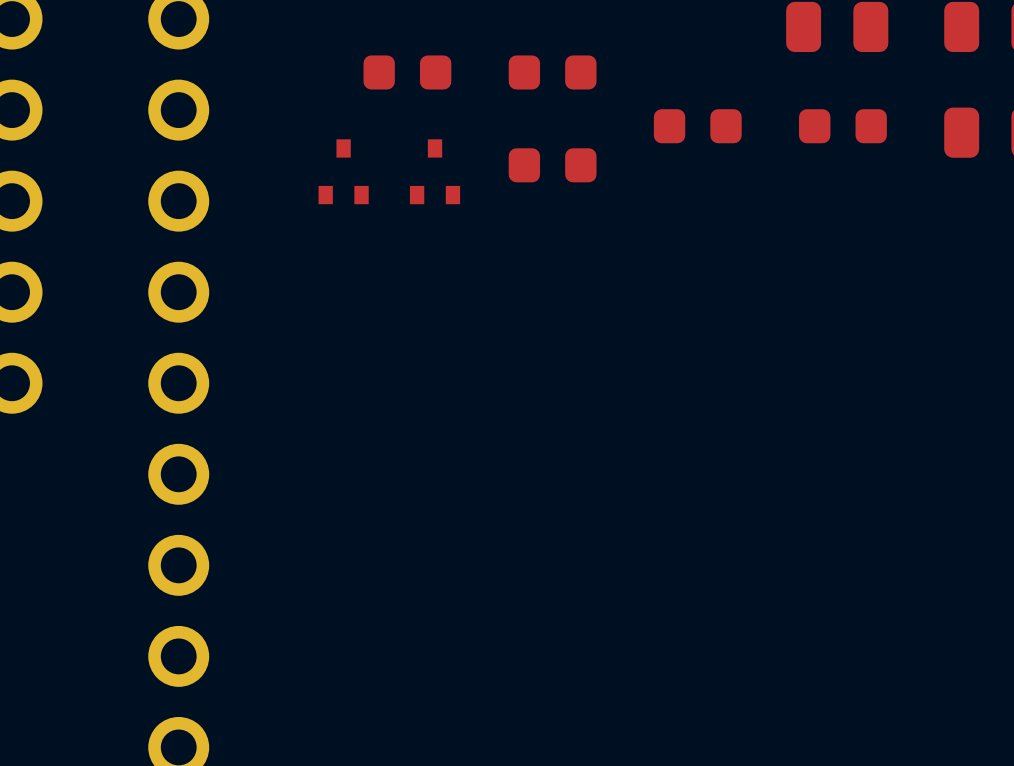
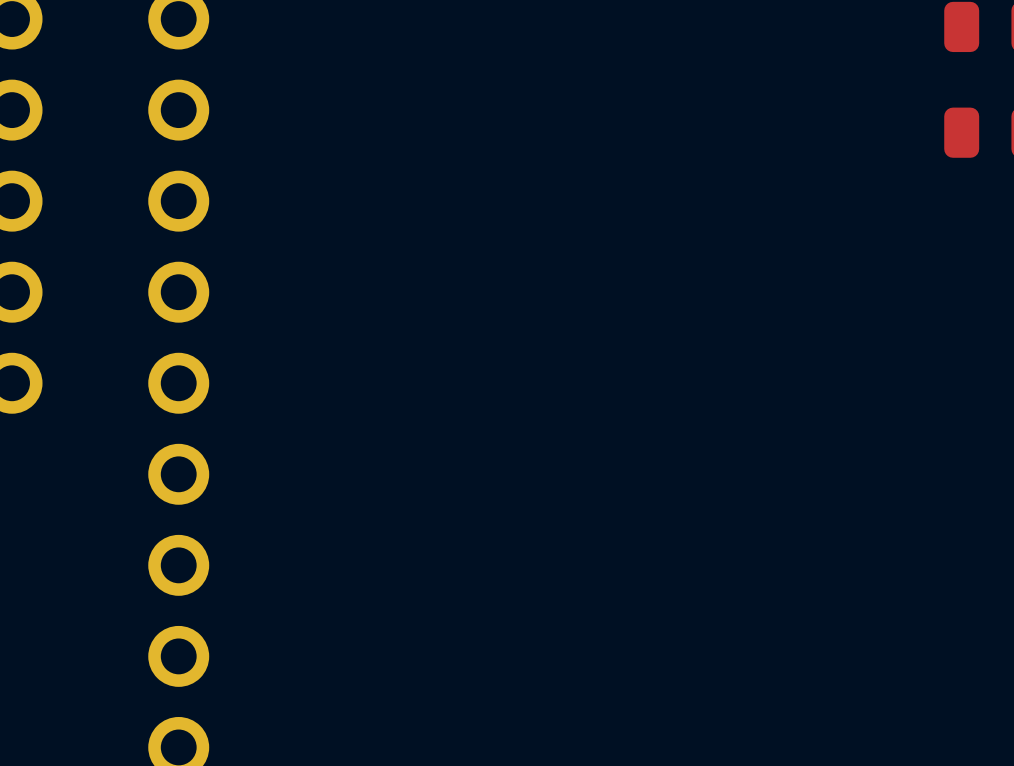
part: (837, 26) -> none
part: (407, 72) -> none
part: (552, 72) -> none
part: (697, 126) -> none
part: (842, 126) -> none
part: (552, 165) -> none
part: (343, 171) -> none
part: (435, 171) -> none

